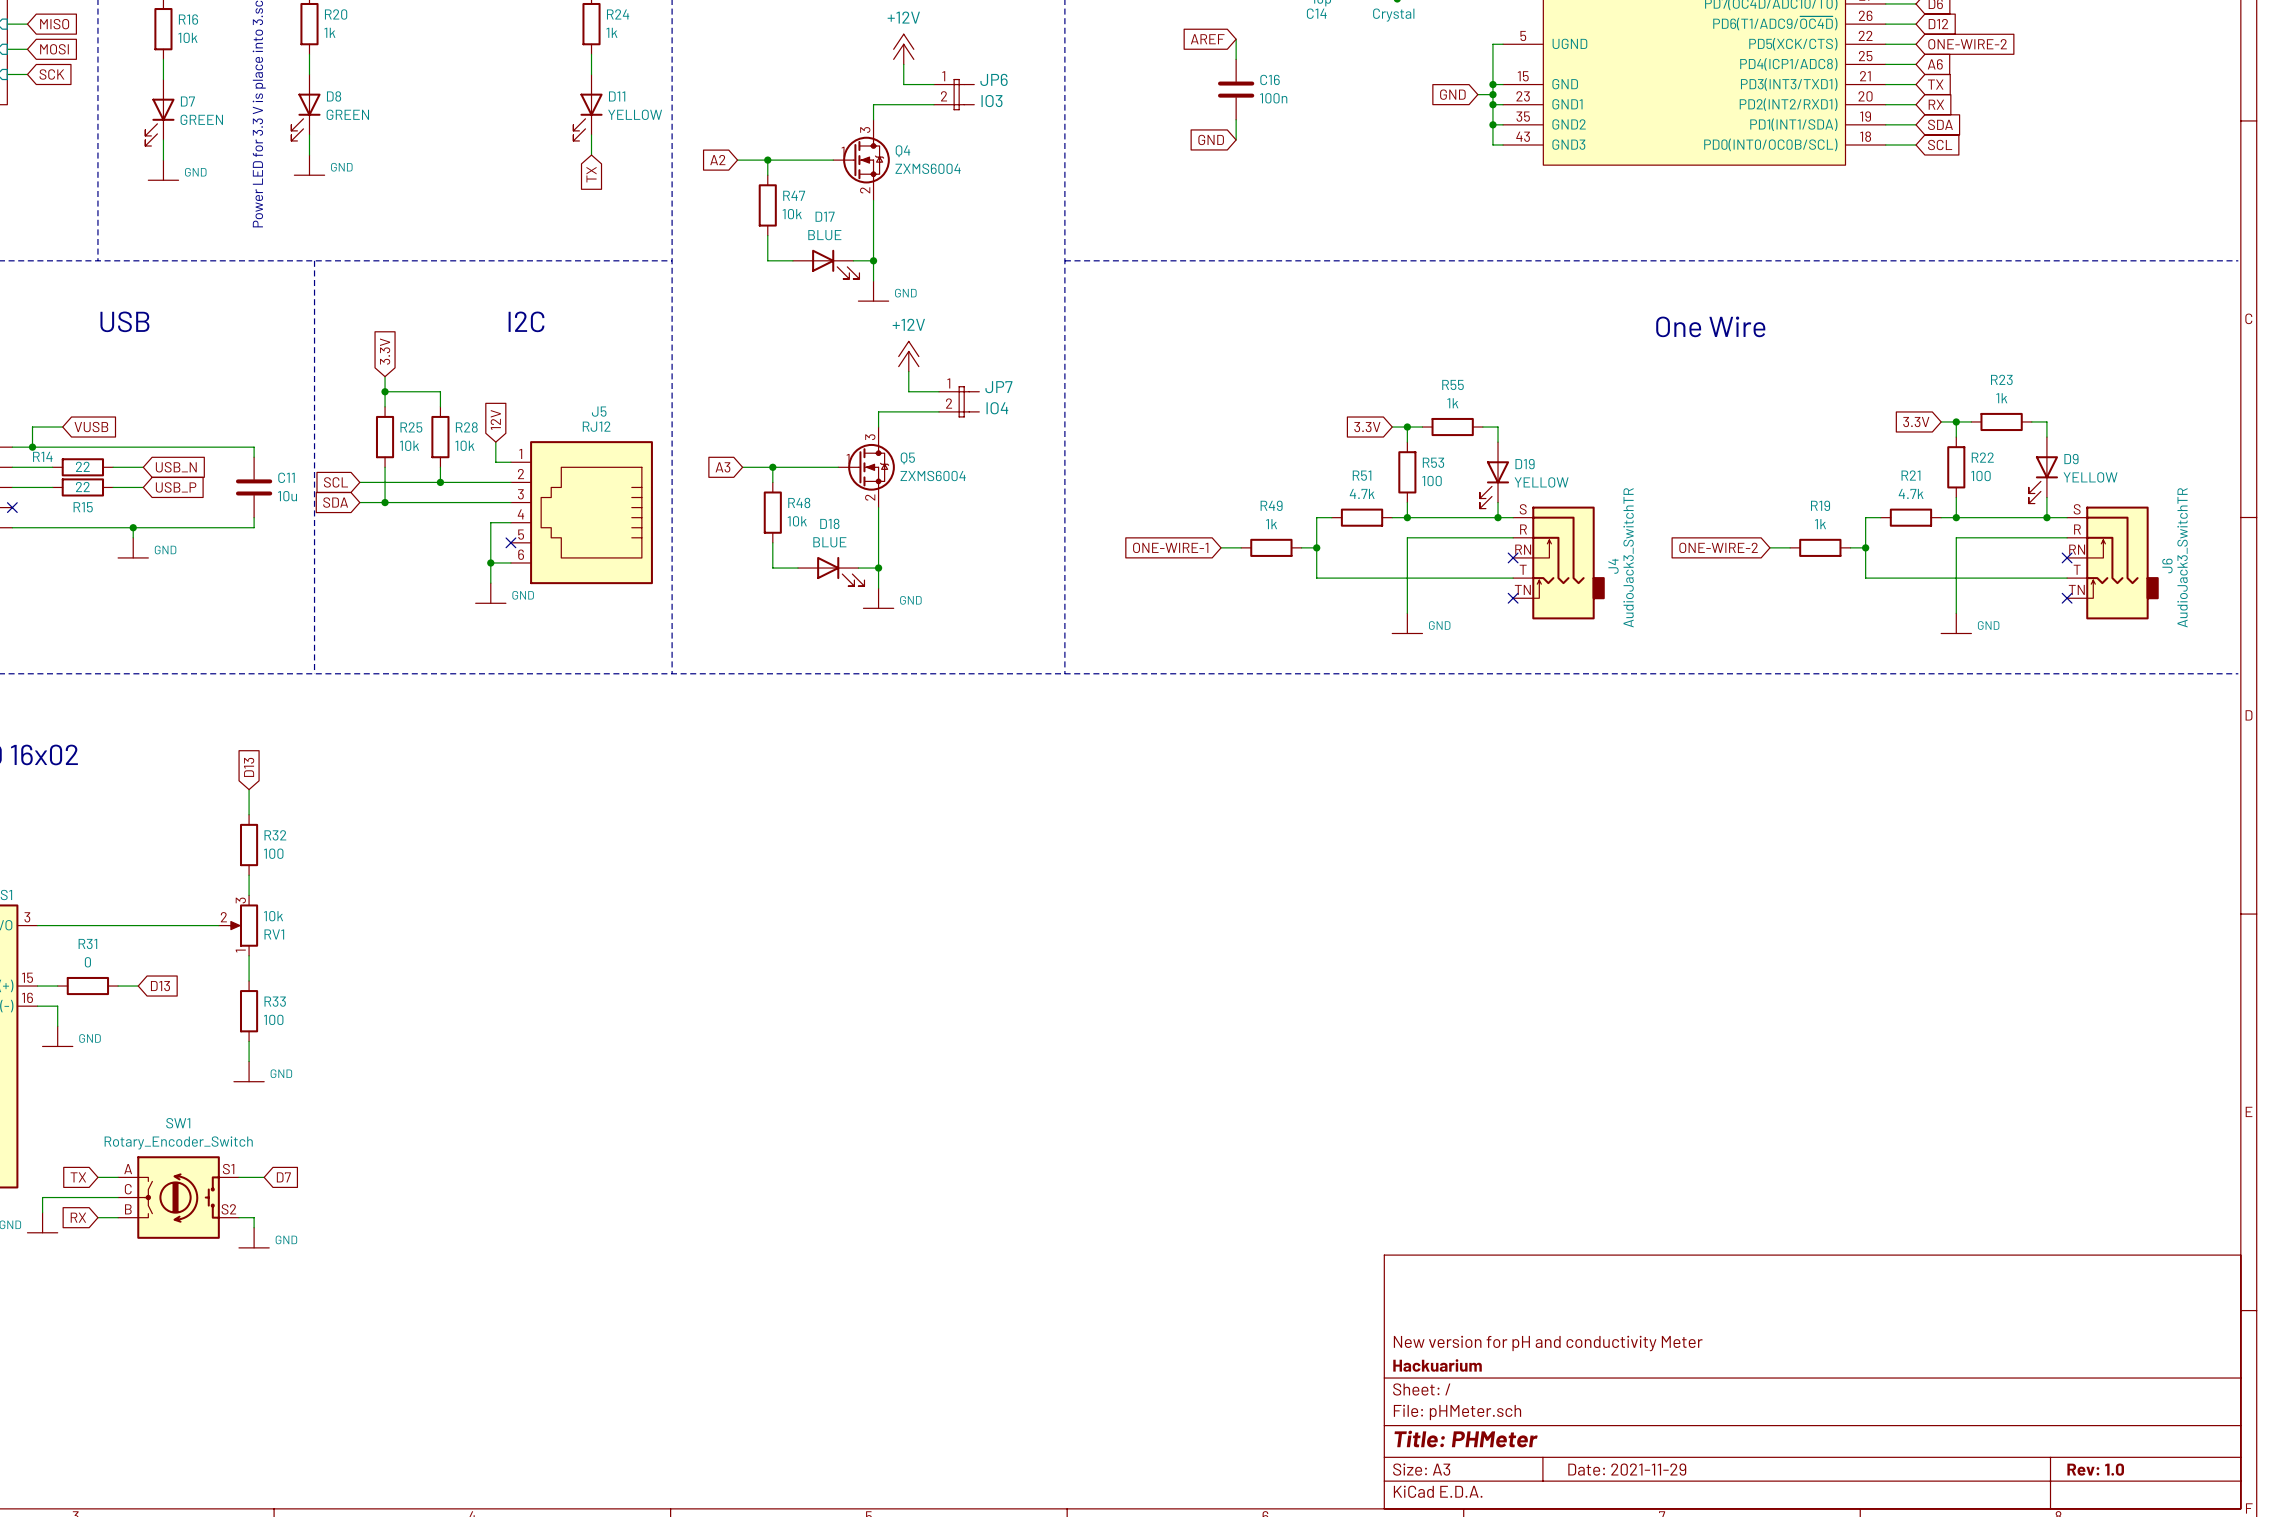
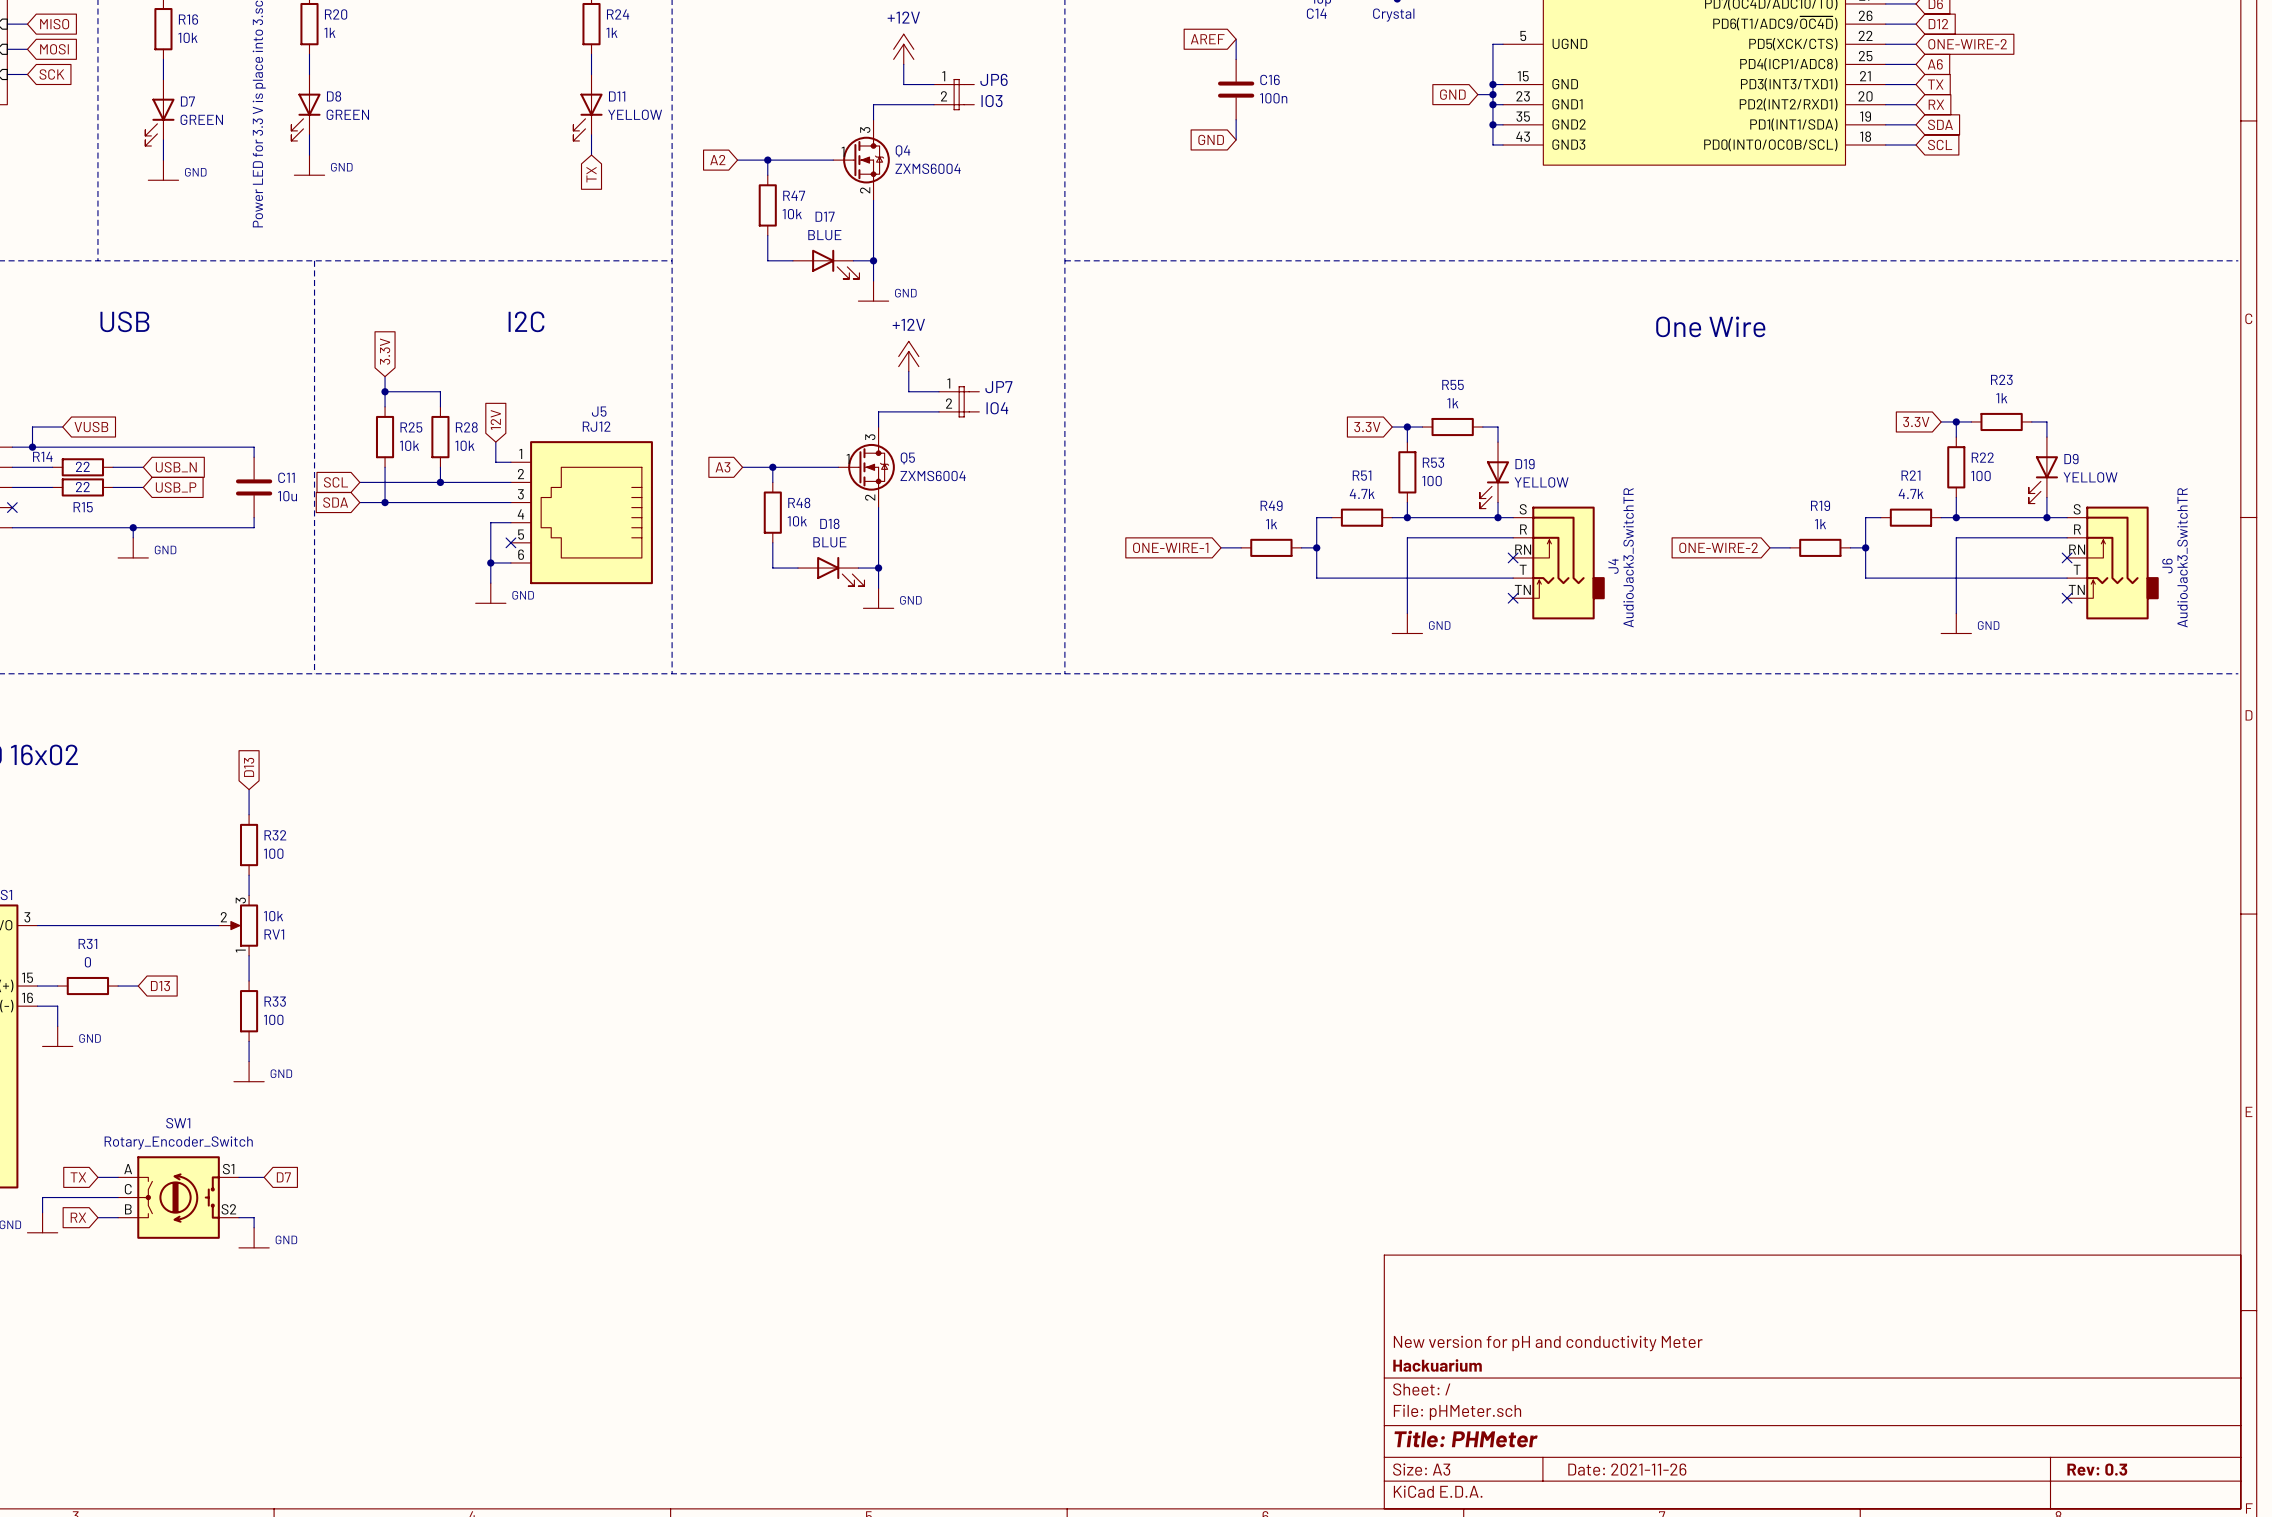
title block: Date: 2021-11-29 (1627, 1469) -> Date: 2021-11-26 (1627, 1469)
title block: Rev: 1.0 (2095, 1469) -> Rev: 0.3 (2097, 1469)

